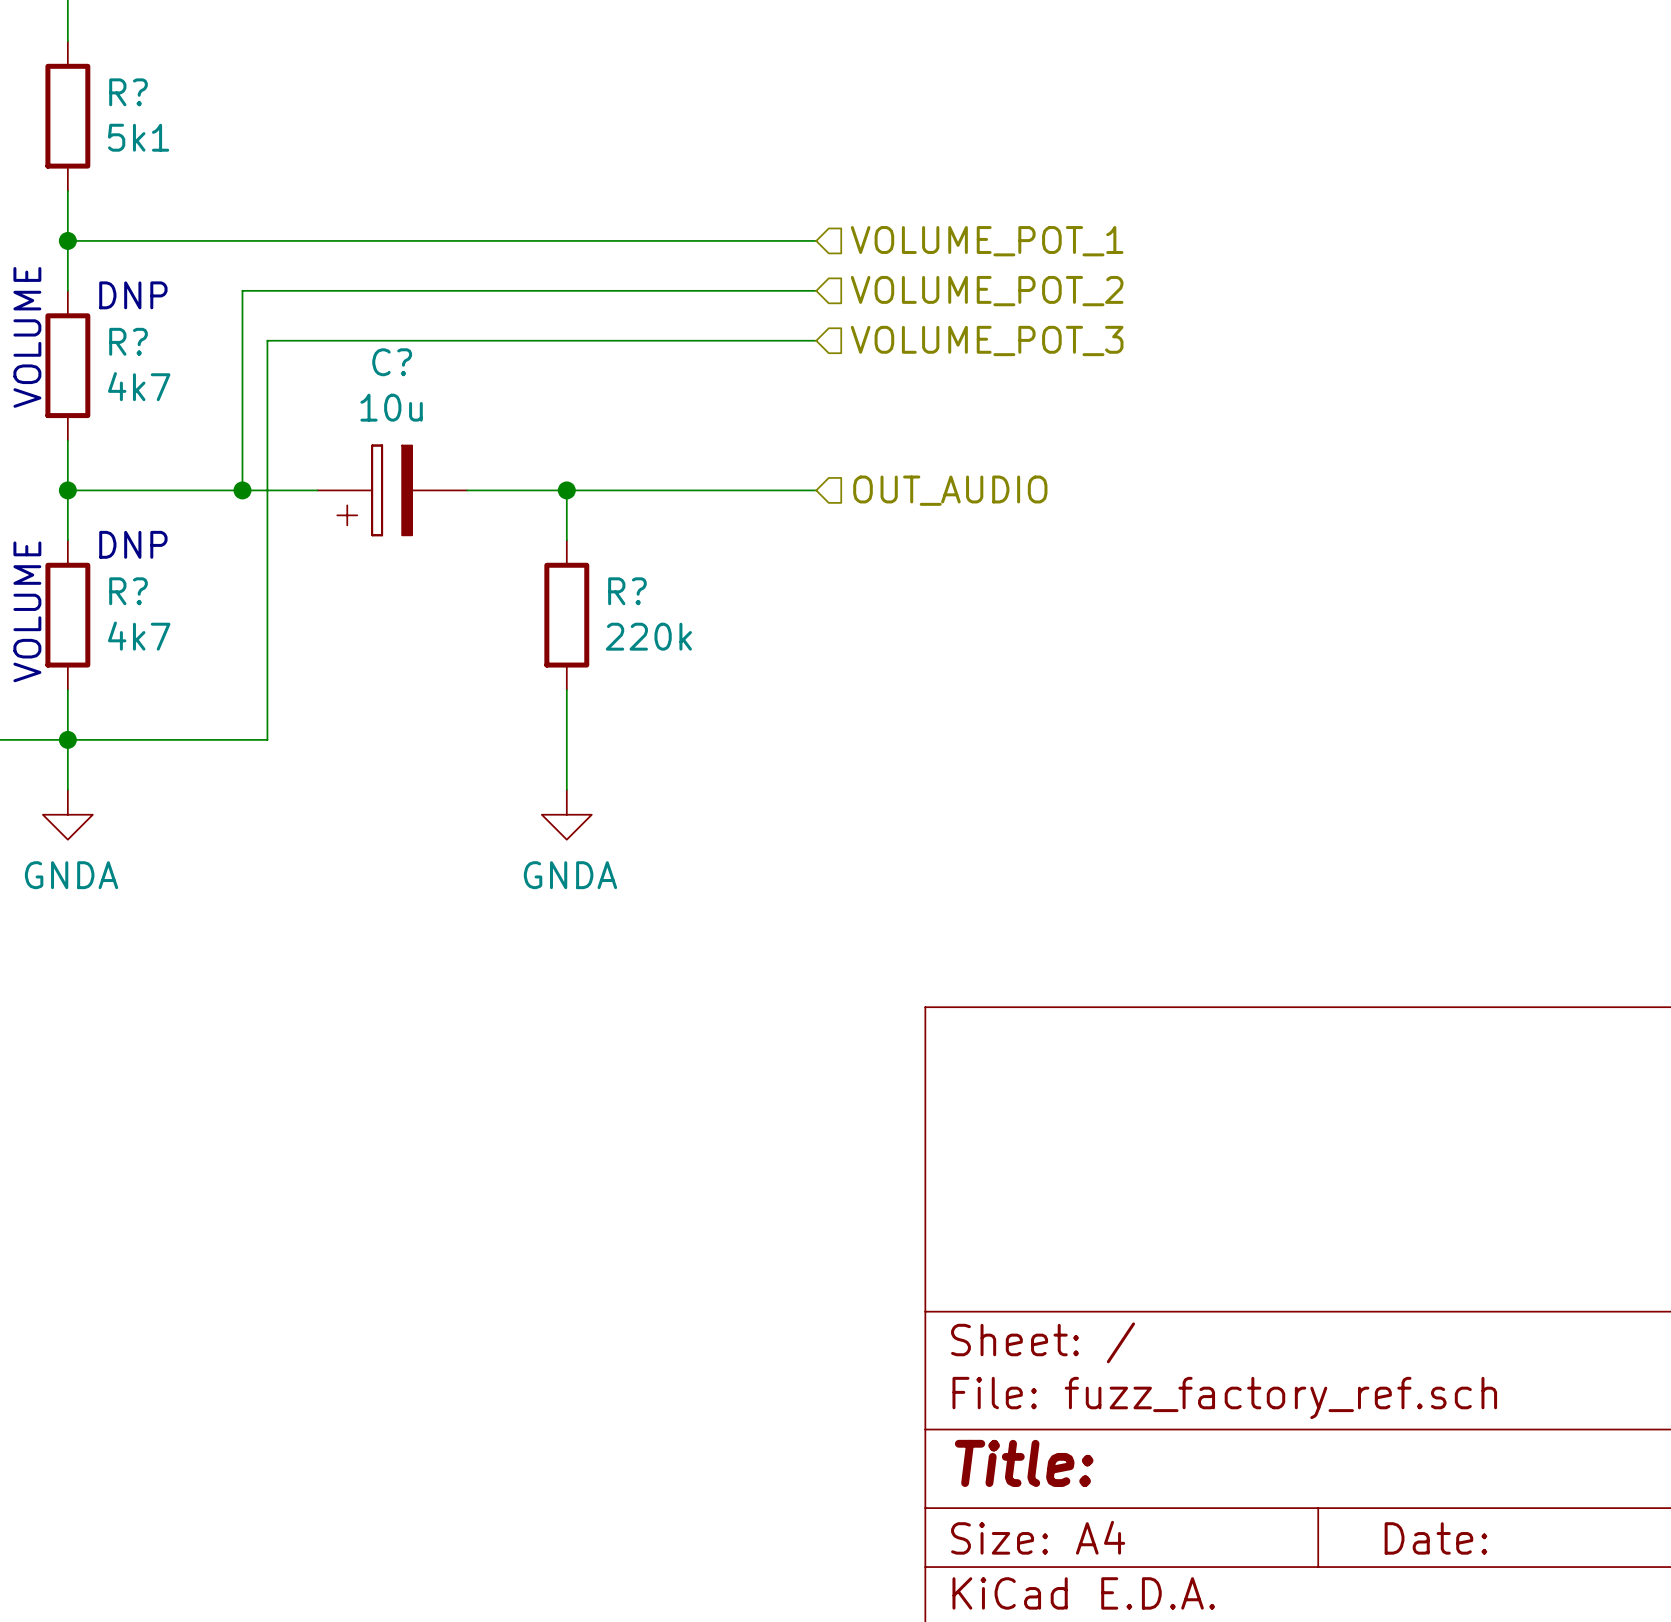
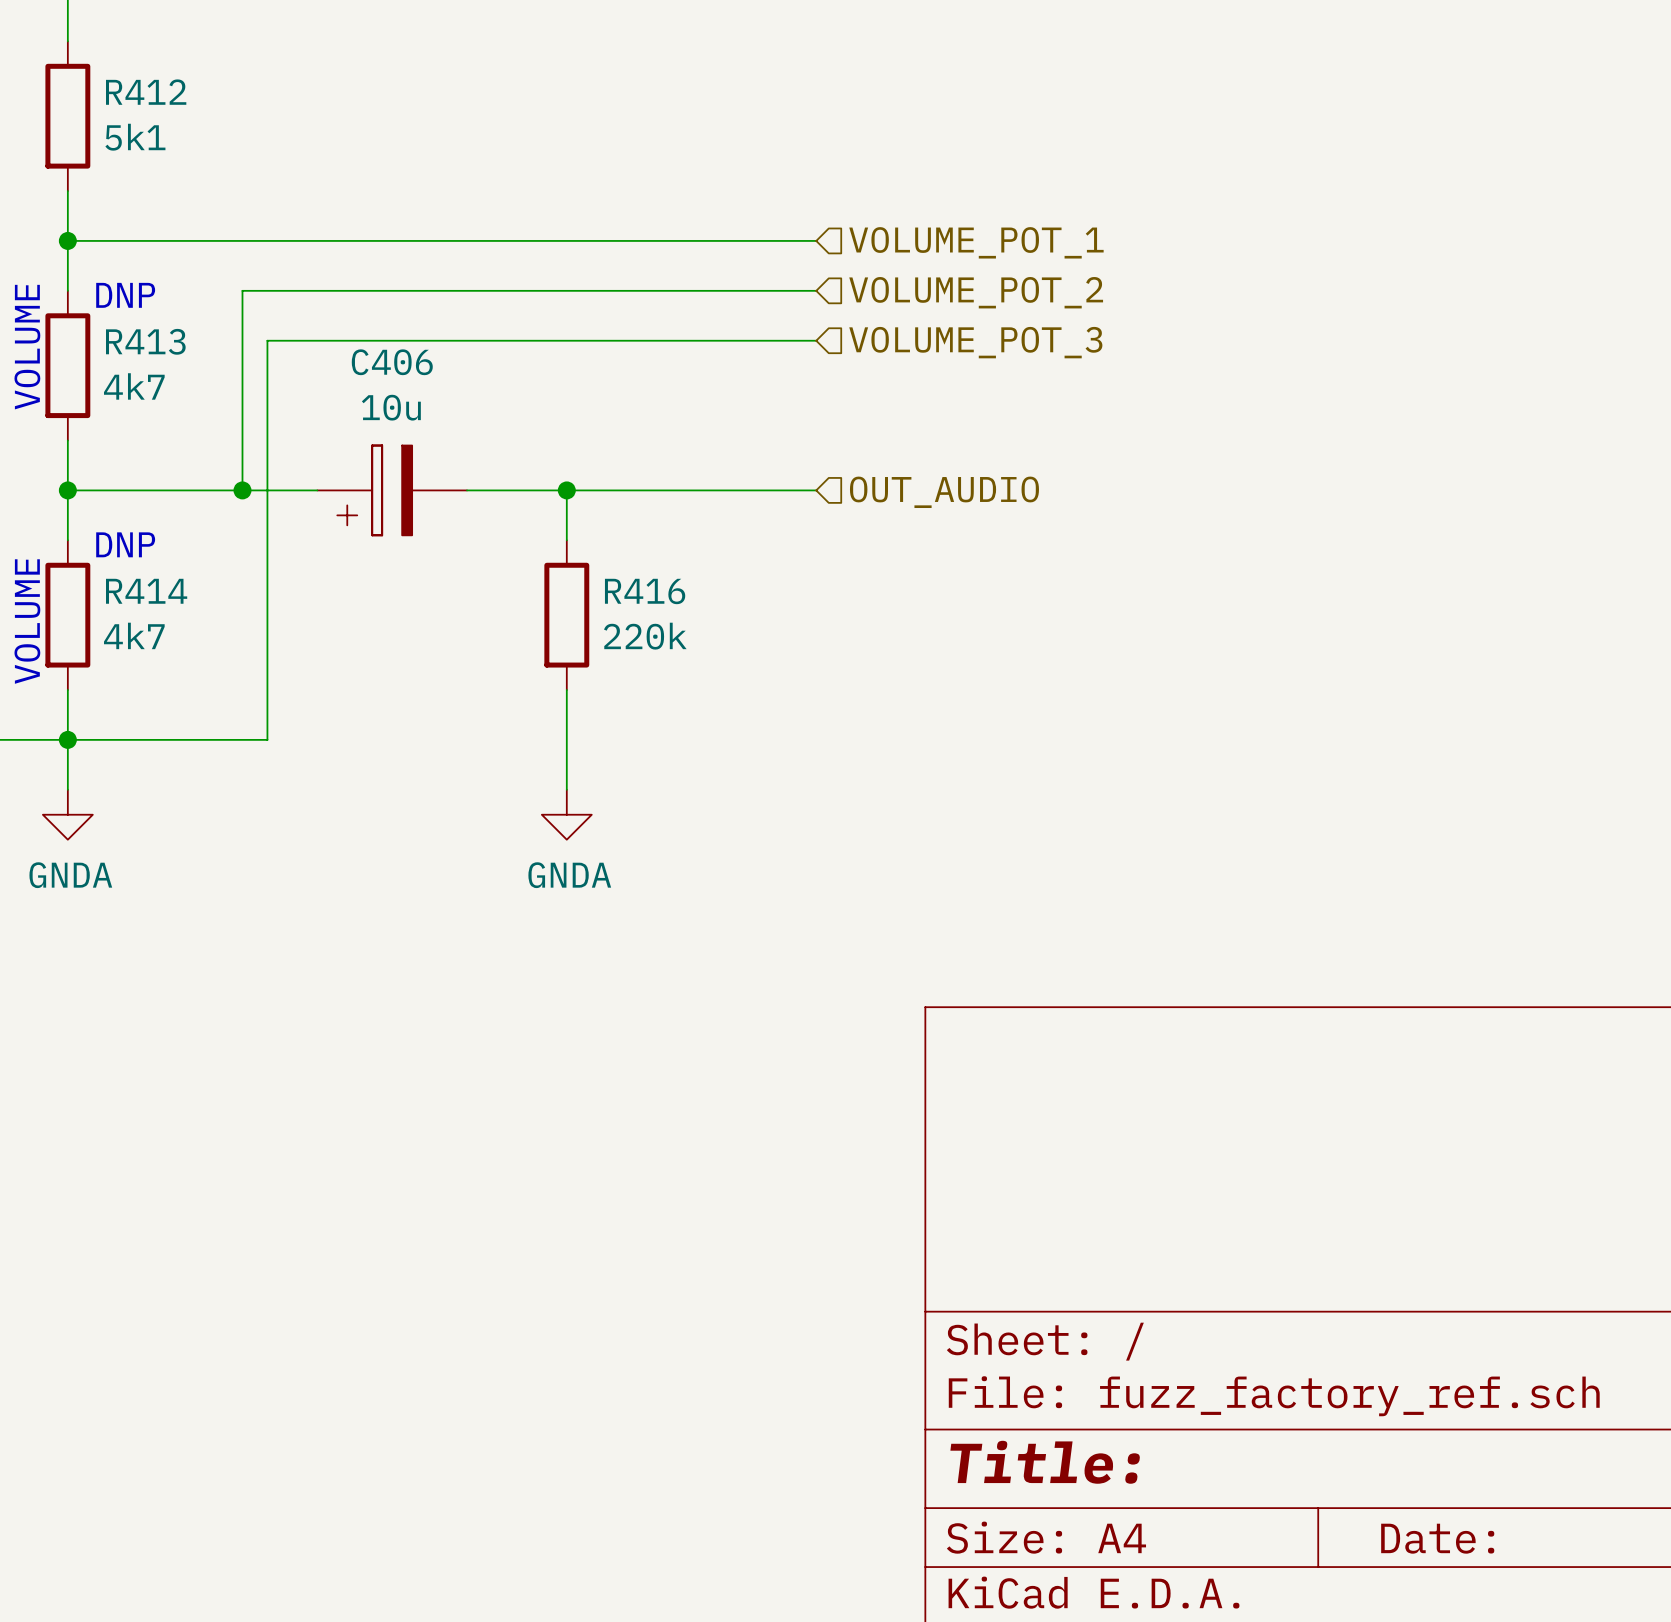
R? name: R? (128, 92) -> R412 (146, 92)
R? name: R? (128, 341) -> R413 (145, 341)
C? name: C? (392, 362) -> C406 (392, 362)
R? name: R? (128, 591) -> R414 (146, 591)
R? name: R? (627, 591) -> R416 (645, 591)

